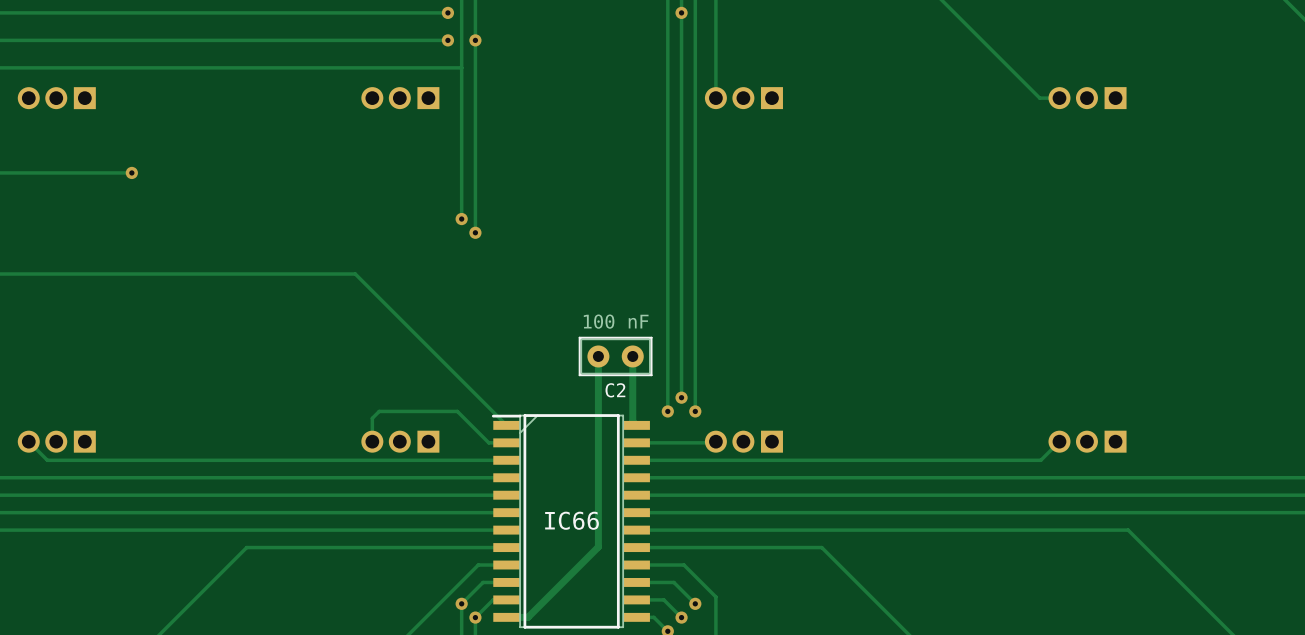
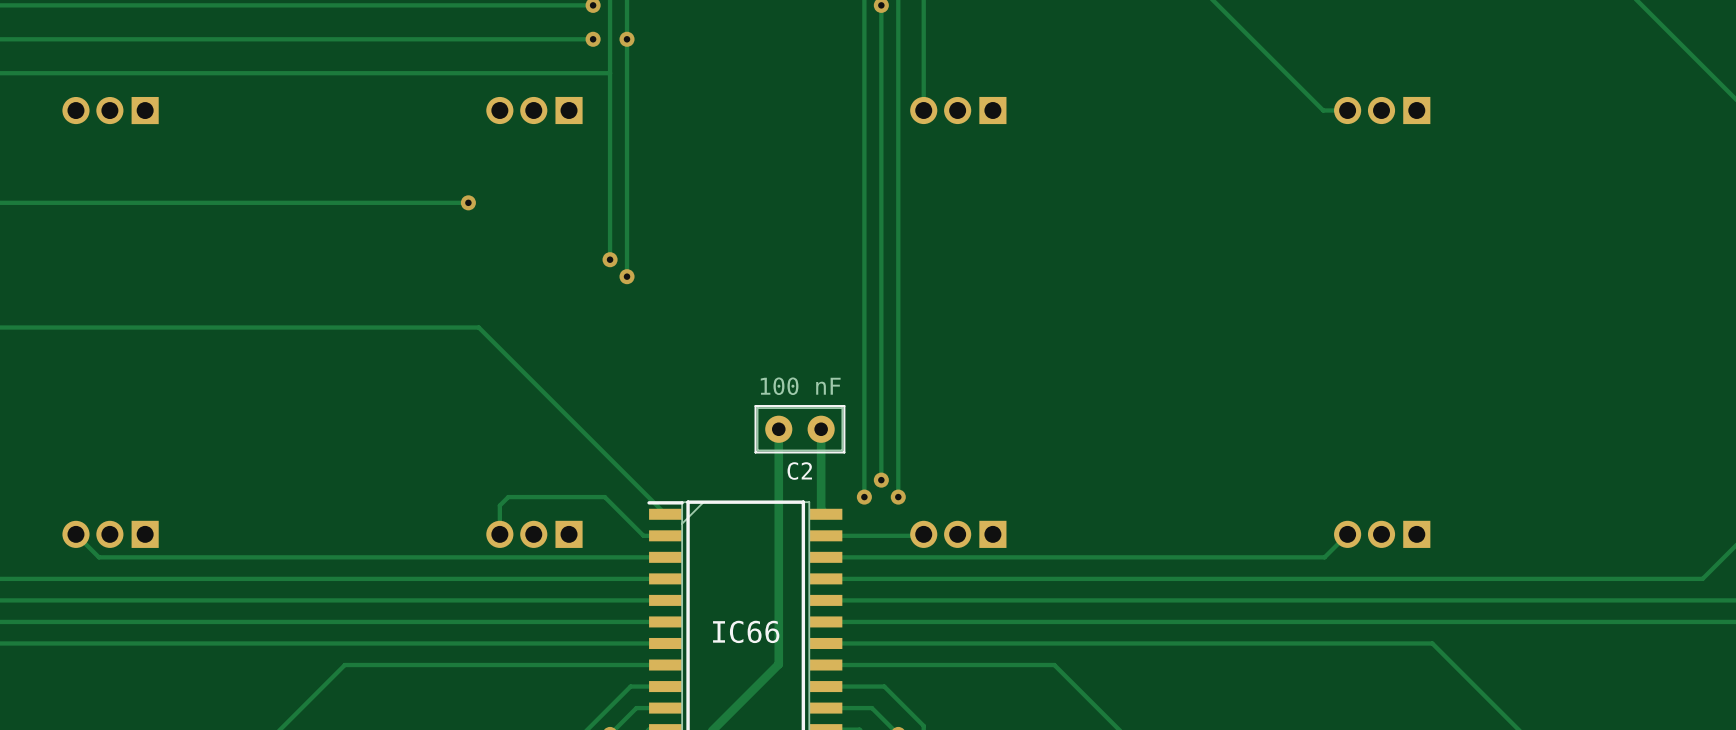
via: (131, 172) -> none
track: none -> (468, 202) (203, 202)
via: none -> (468, 202)

